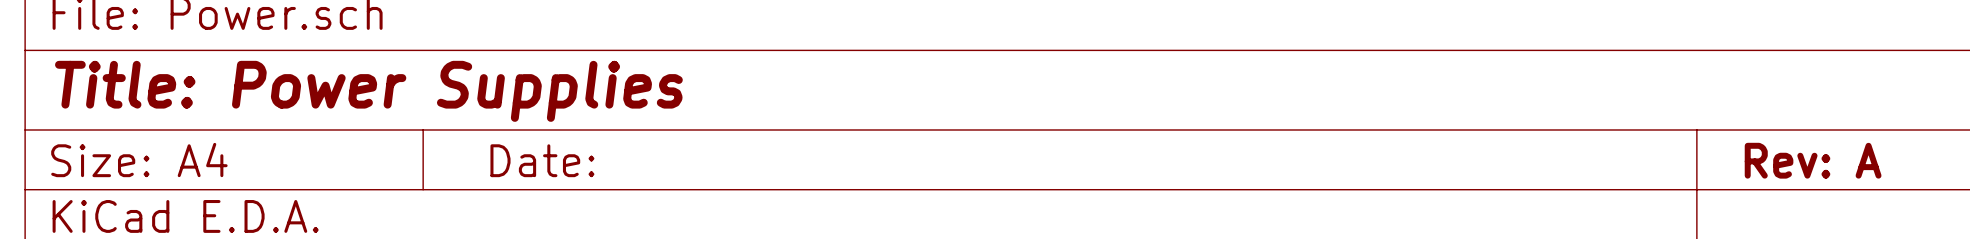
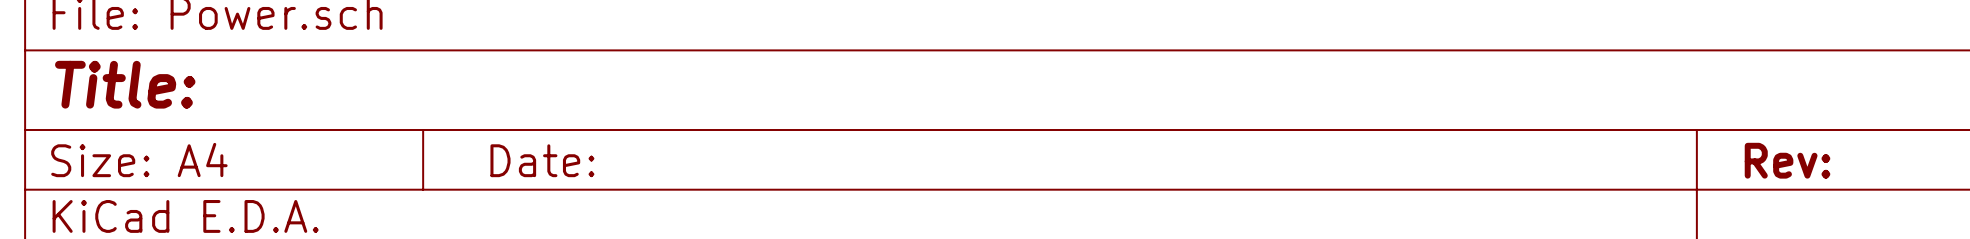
title block: Title: Power Supplies (368, 91) -> Title: (125, 84)
title block: Rev: A (1813, 160) -> Rev: (1787, 160)

